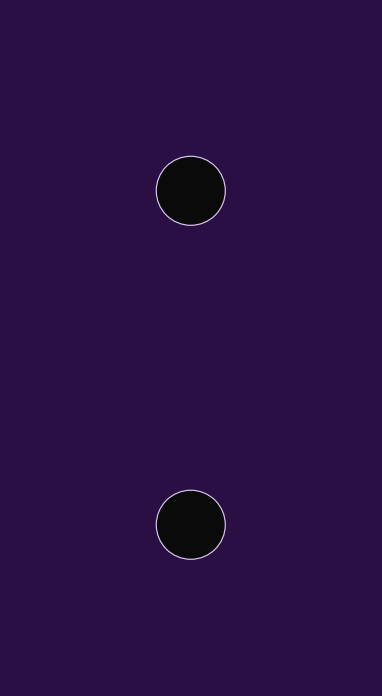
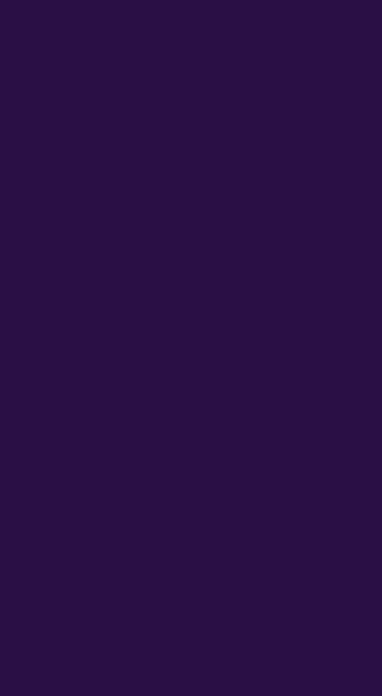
part: (190, 190) -> none
part: (190, 524) -> none

